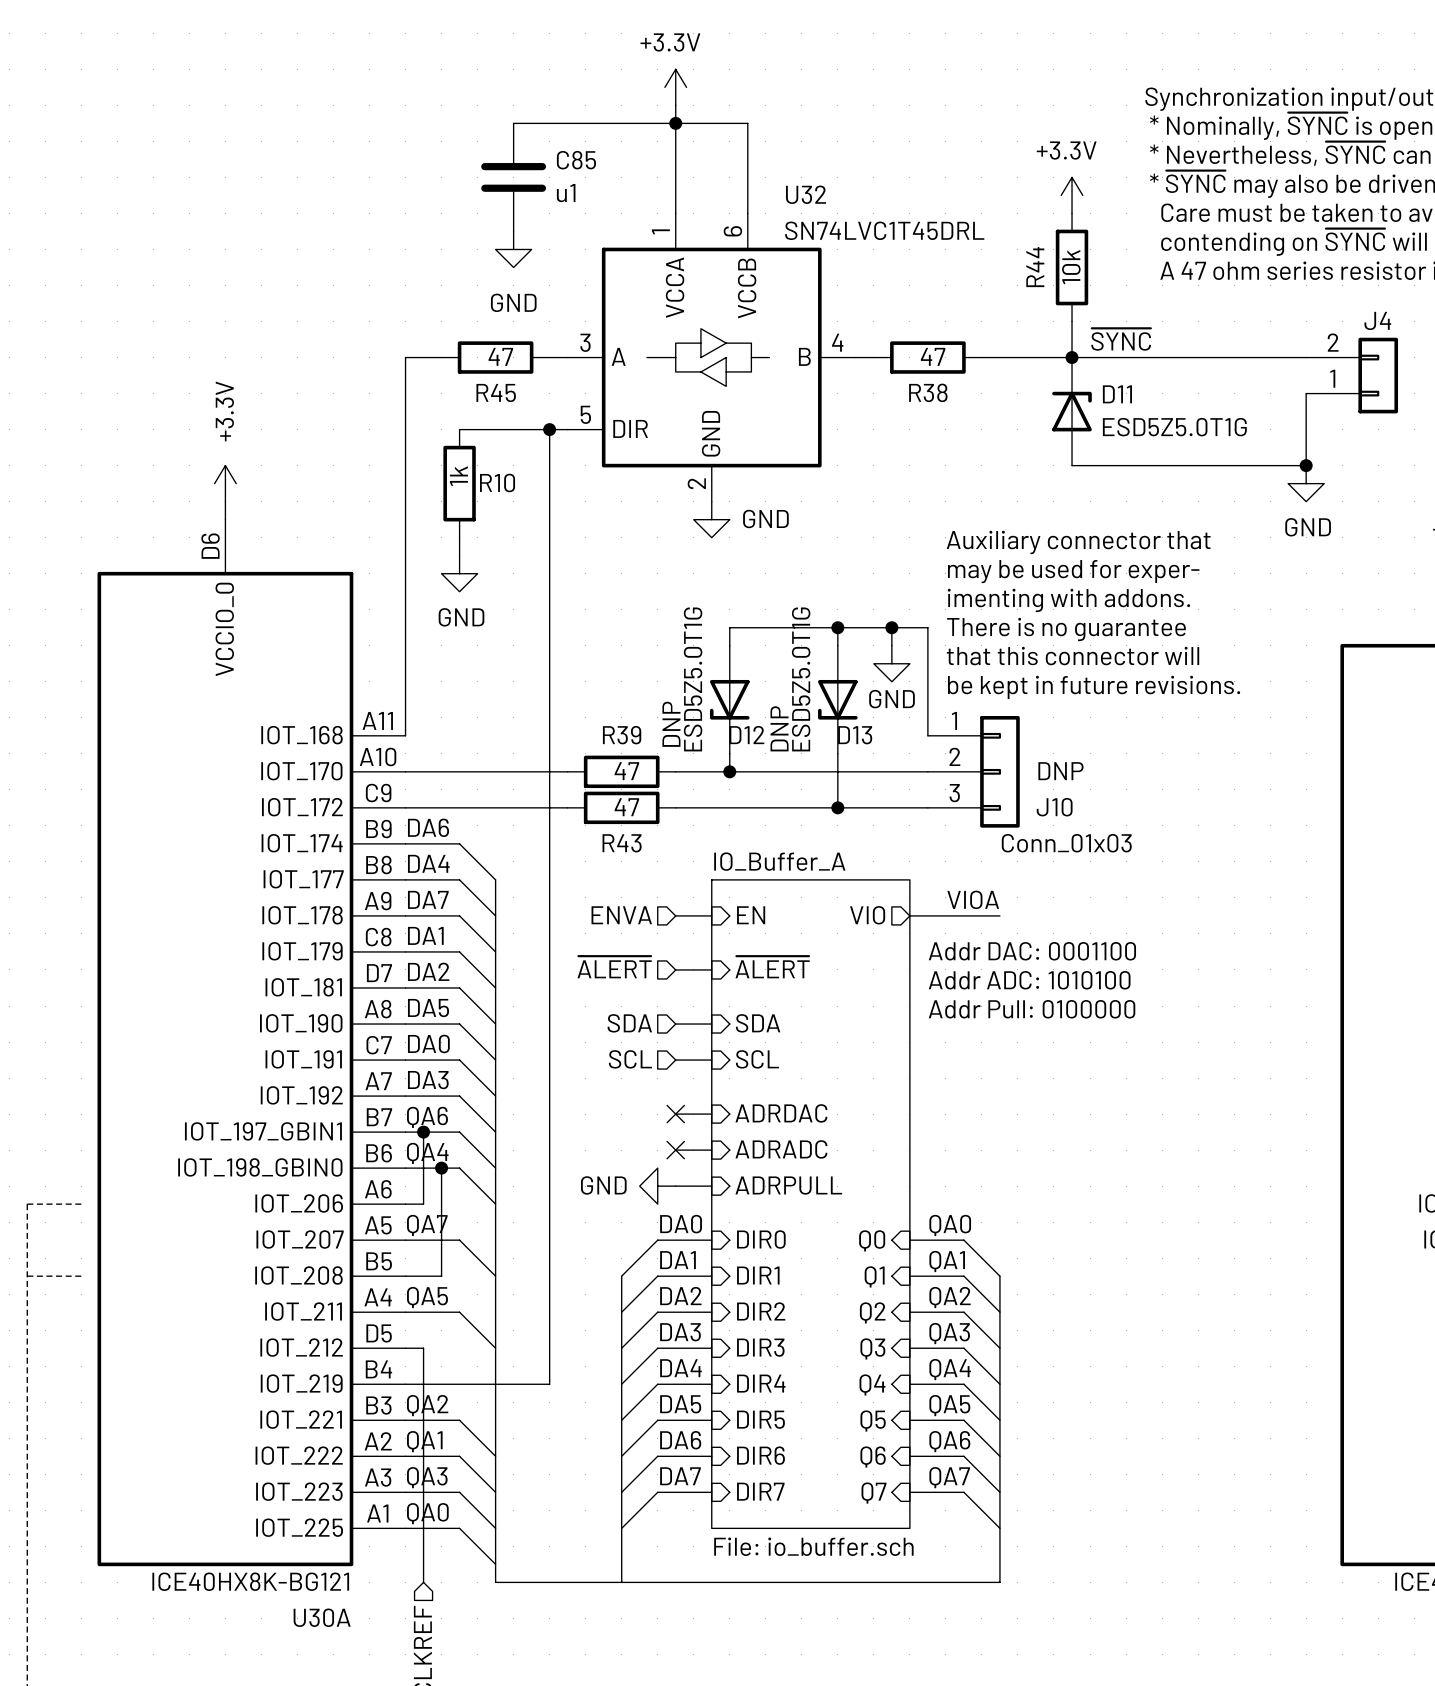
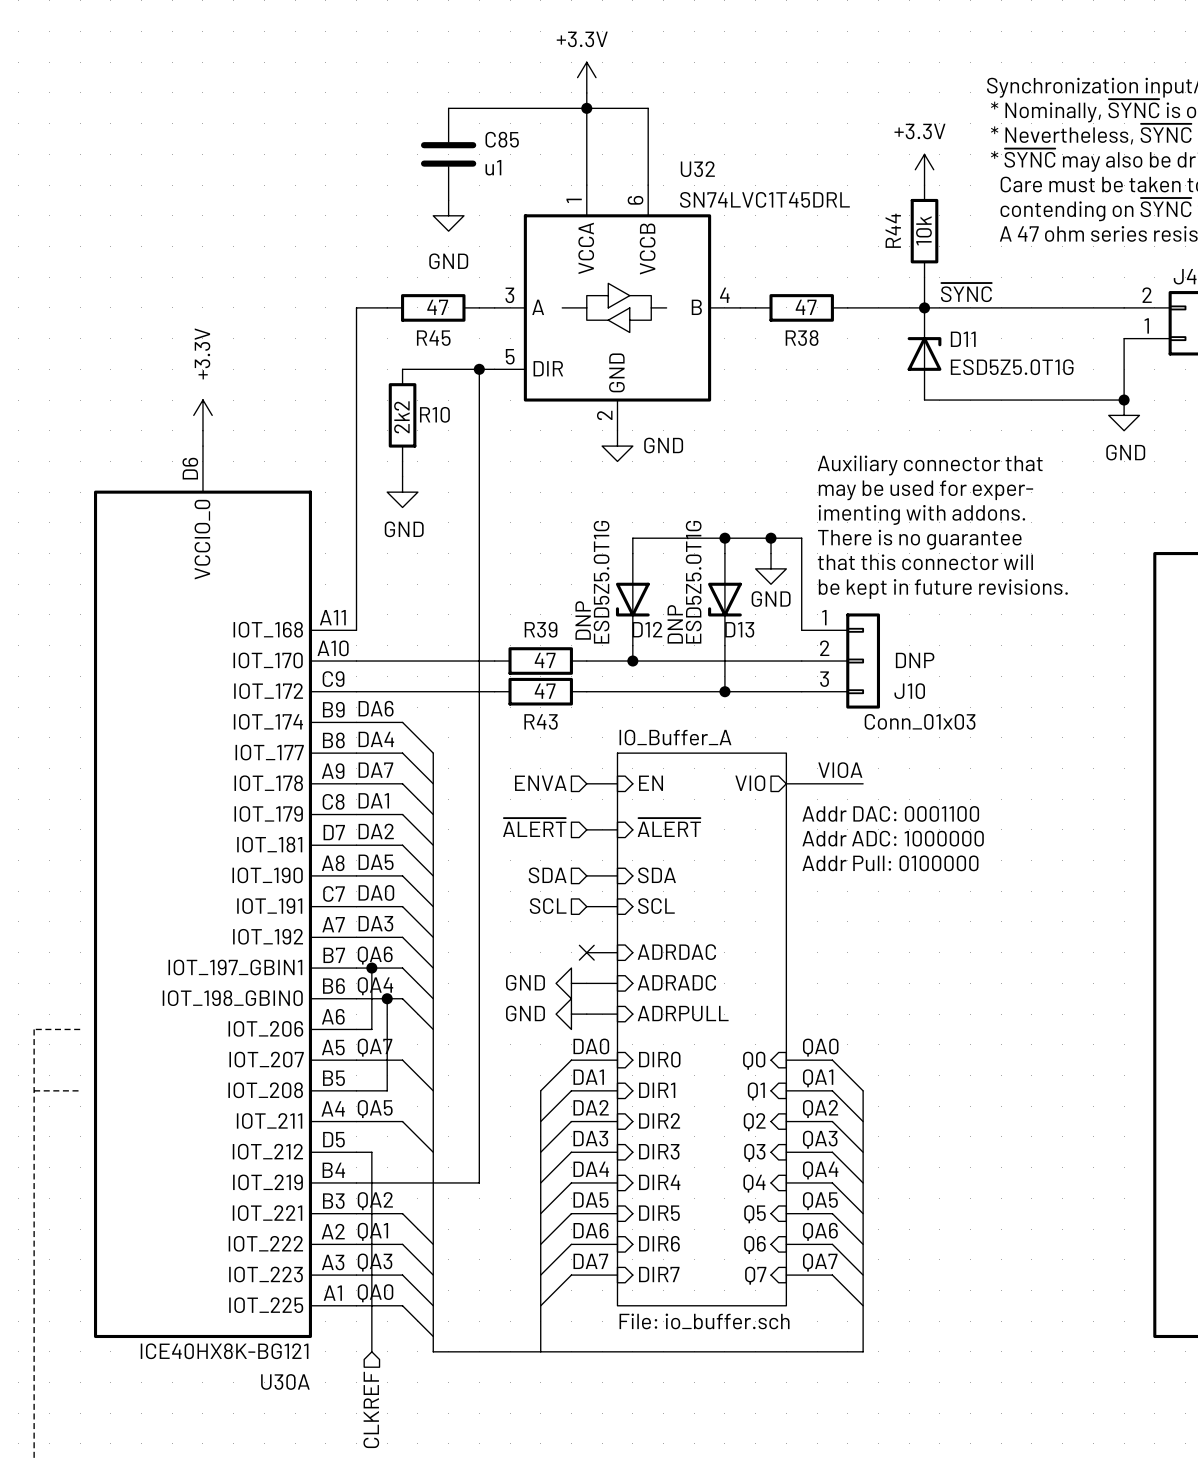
R10 value: 1k (458, 476) -> 2k2 (401, 417)
text: Addr ADC: 1010100 (1029, 980) -> Addr ADC: 1000000 (893, 838)
power symbol: none -> GND (571, 983)
no-connect mark: (675, 1150) -> none

